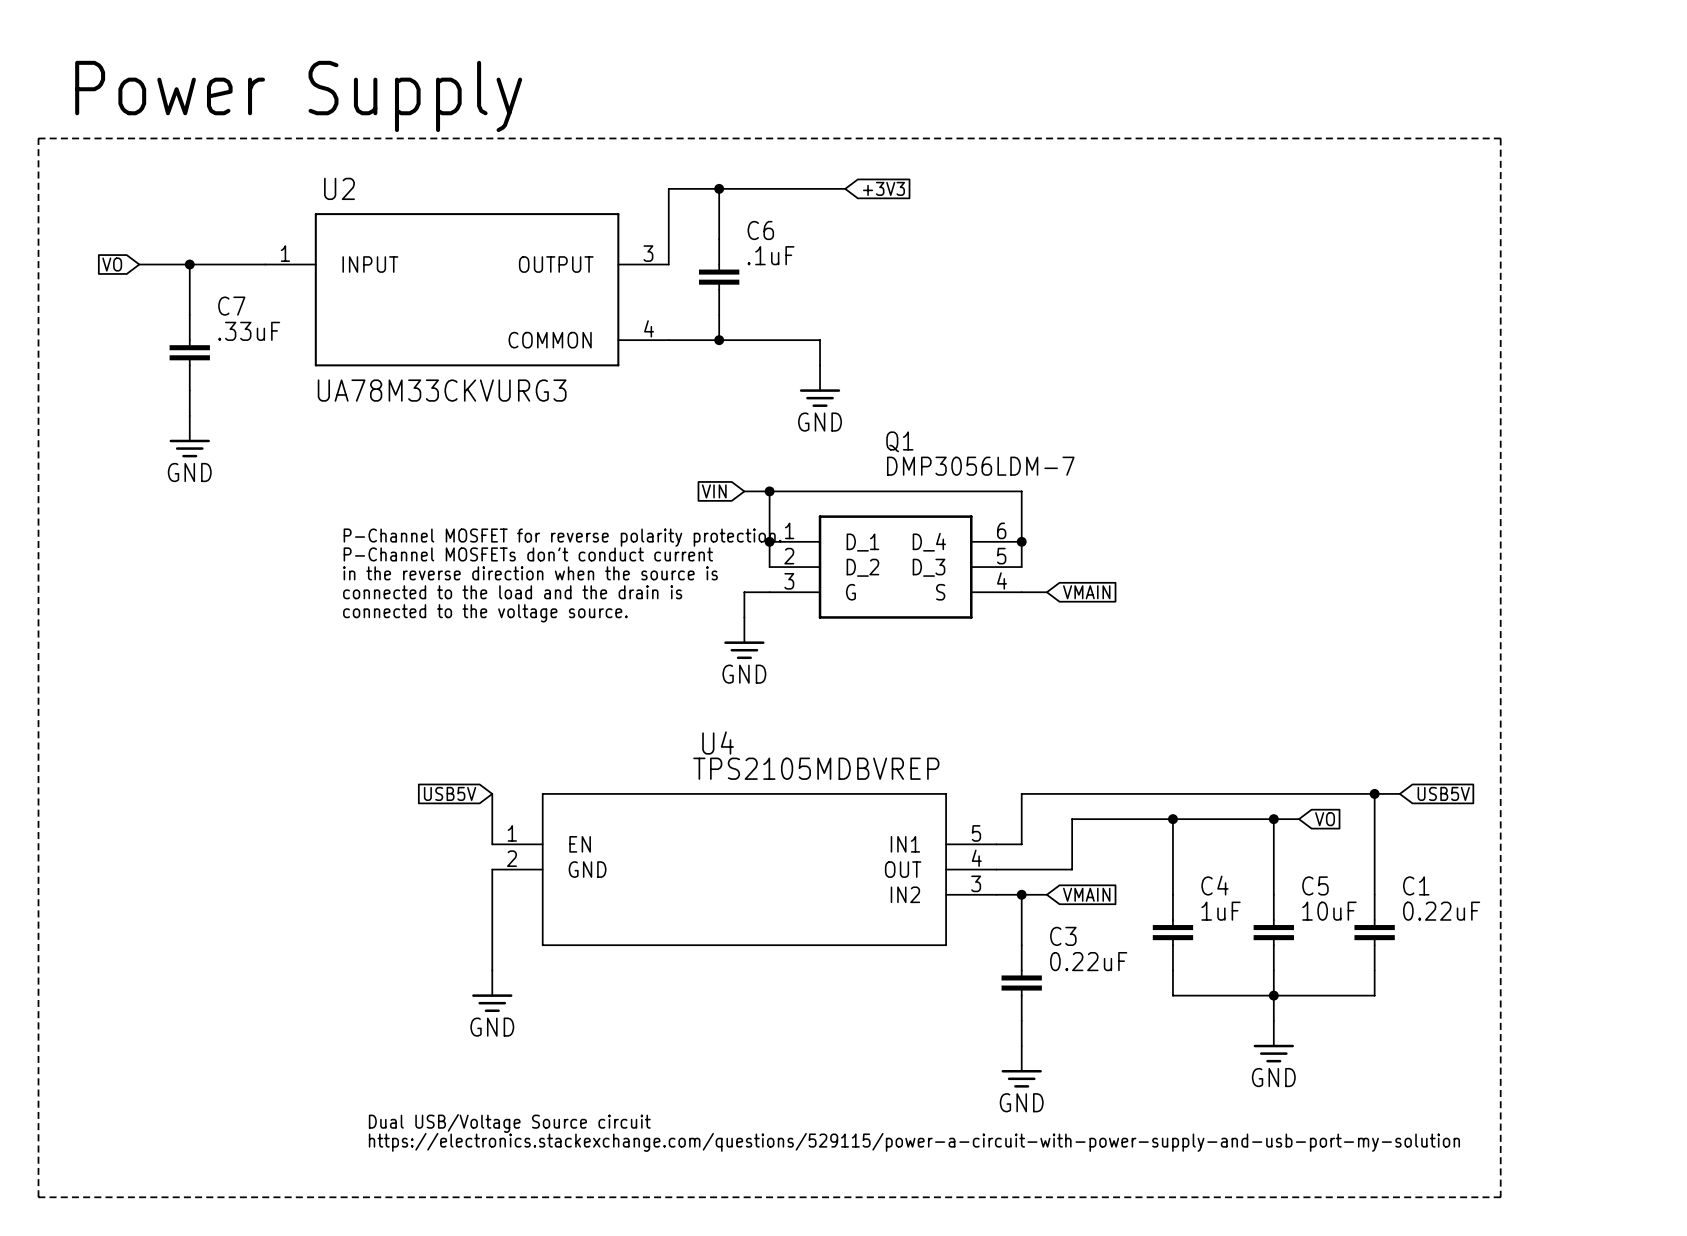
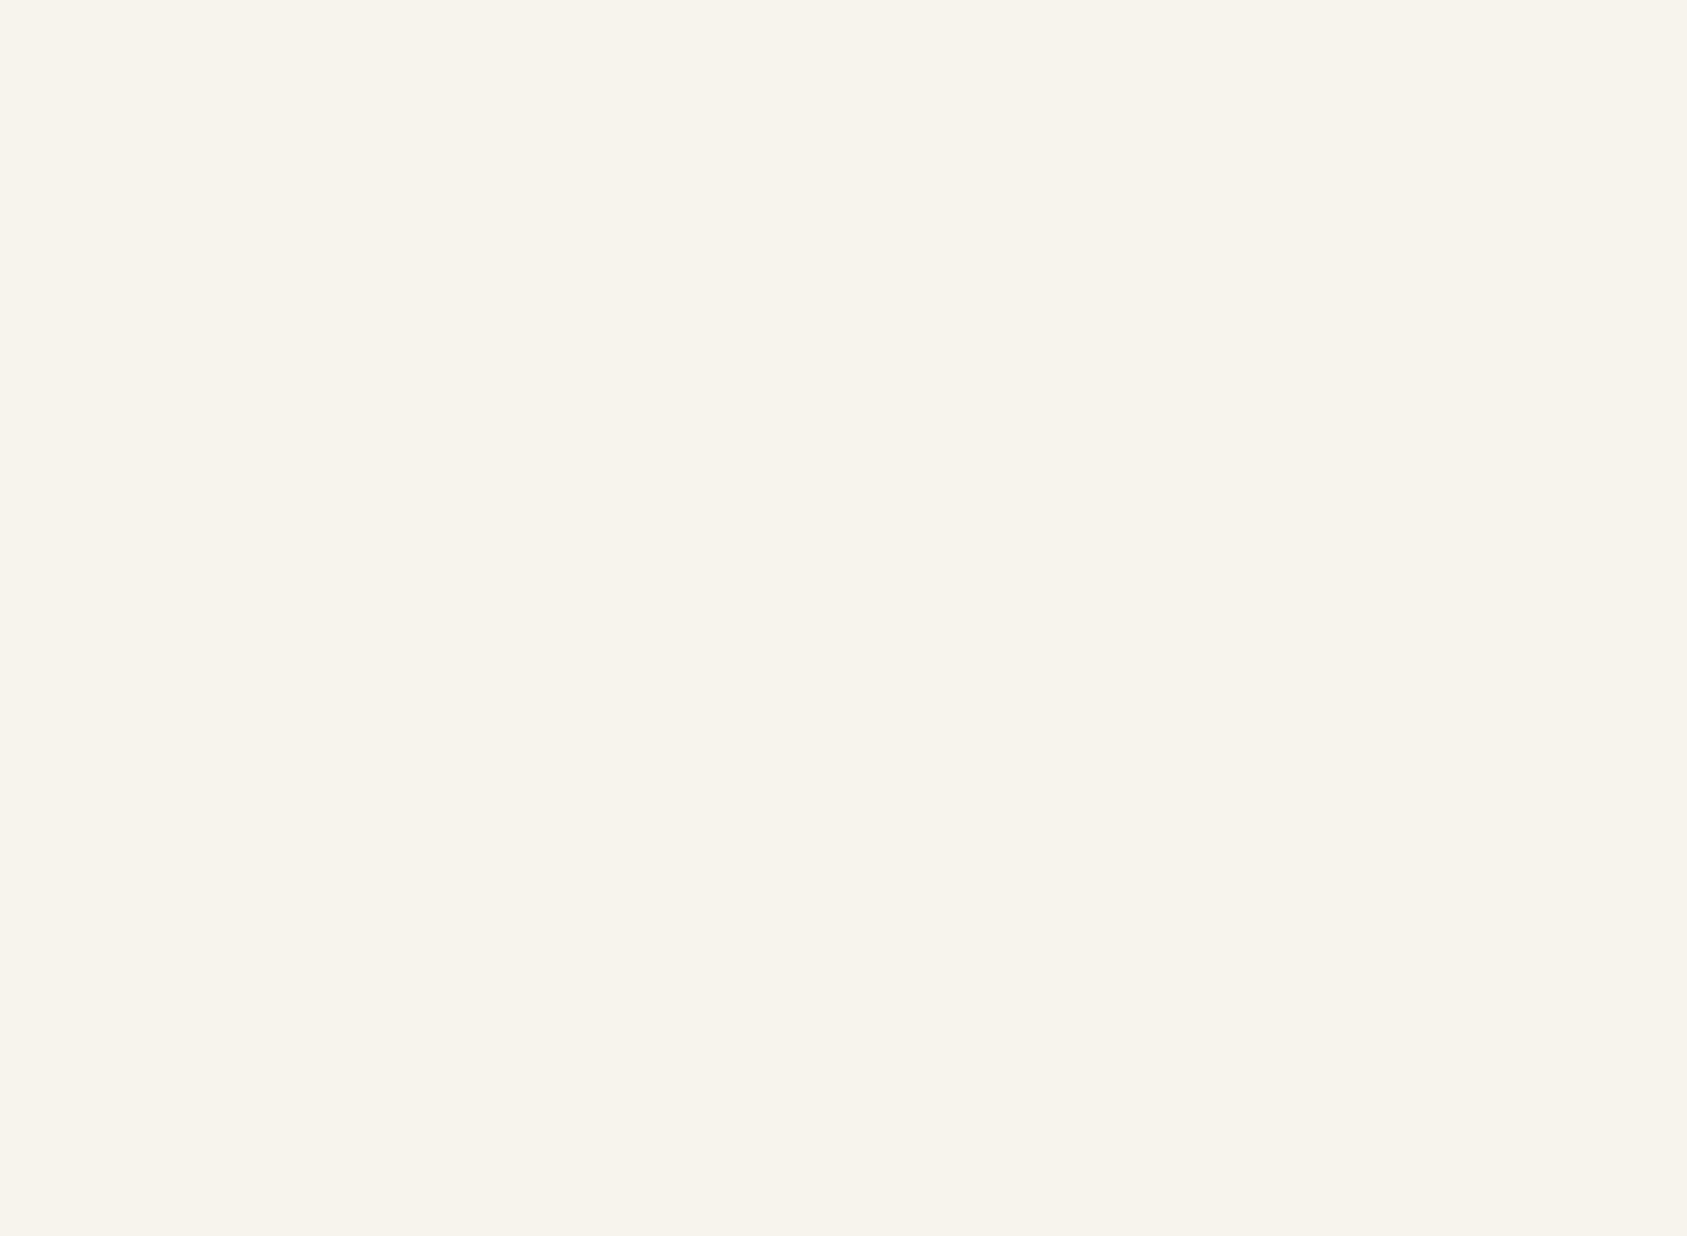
text: Power Supply (298, 96) -> none
line: (38, 138) (1500, 138) (1500, 1197) (38, 1197) (38, 138) -> none
wire: (719, 188) (719, 239) -> none
junction: (719, 188) -> none
wire: (845, 188) (668, 188) (668, 264) -> none
global label: +3V3 (883, 188) -> none
global label: VO (112, 264) -> none
wire: (139, 264) (265, 264) -> none
wire: (189, 264) (189, 314) -> none
junction: (189, 264) -> none
C6: .1uF (719, 277) -> none
U2: UA78M33CKVURG3 (467, 289) -> none
wire: (719, 314) (719, 340) -> none
wire: (668, 340) (820, 340) (820, 365) -> none
junction: (719, 340) -> none
C7: .33uF (189, 352) -> none
power symbol: GND (820, 386) -> none
wire: (189, 390) (189, 415) -> none
power symbol: GND (189, 436) -> none
global label: VIN (714, 491) -> none
wire: (744, 491) (1021, 491) (1021, 567) -> none
wire: (769, 491) (769, 567) -> none
junction: (769, 491) -> none
text: P-Channel MOSFET for reverse polarity protection. (562, 537) -> none
junction: (769, 541) -> none
junction: (1021, 541) -> none
text: P-Channel MOSFETs don't conduct current (528, 554) -> none
Q1: DMP3056LDM-7 (895, 567) -> none
text: in the reverse direction when the source is (530, 573) -> none
text: connected to the load and the drain is (512, 592) -> none
wire: (769, 592) (744, 592) (744, 617) -> none
wire: (1021, 592) (1046, 592) -> none
global label: VMAIN (1086, 592) -> none
text: connected to the voltage source. (485, 613) -> none
power symbol: GND (744, 638) -> none
global label: USB5V (450, 793) -> none
wire: (492, 793) (492, 844) -> none
wire: (1374, 793) (1374, 894) -> none
junction: (1374, 793) -> none
wire: (1399, 793) (1021, 793) (1021, 844) (996, 844) -> none
global label: USB5V (1443, 793) -> none
wire: (1172, 819) (1172, 894) -> none
junction: (1172, 819) -> none
wire: (1273, 819) (1273, 894) -> none
junction: (1273, 819) -> none
wire: (1299, 819) (1072, 819) (1072, 869) (996, 869) -> none
global label: VO (1325, 819) -> none
wire: (492, 869) (492, 970) -> none
U4: TPS2105MDBVREP (744, 869) -> none
wire: (996, 894) (1046, 894) -> none
wire: (1021, 894) (1021, 945) -> none
junction: (1021, 894) -> none
global label: VMAIN (1086, 894) -> none
C4: 1uF (1172, 932) -> none
C5: 10uF (1273, 932) -> none
C1: 0.22uF (1374, 932) -> none
wire: (1172, 970) (1172, 995) (1374, 995) (1374, 970) -> none
wire: (1273, 970) (1273, 1020) -> none
C3: 0.22uF (1021, 983) -> none
power symbol: GND (492, 991) -> none
junction: (1273, 995) -> none
wire: (1021, 1020) (1021, 1046) -> none
power symbol: GND (1273, 1041) -> none
power symbol: GND (1021, 1066) -> none
text: Dual USB/Voltage Source circuit (509, 1123) -> none
text: https://electronics.stackexchange.com/questions/529115/power-a-circuit-with-power-supply-and-usb-port-my-solution (914, 1142) -> none

